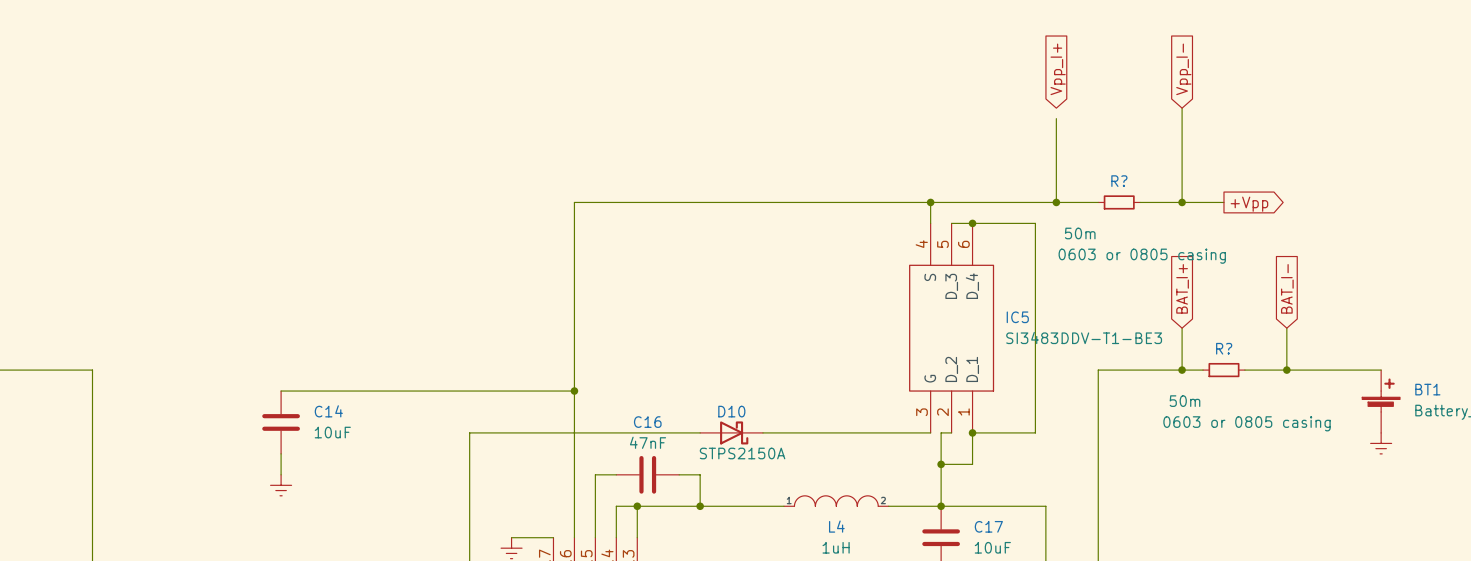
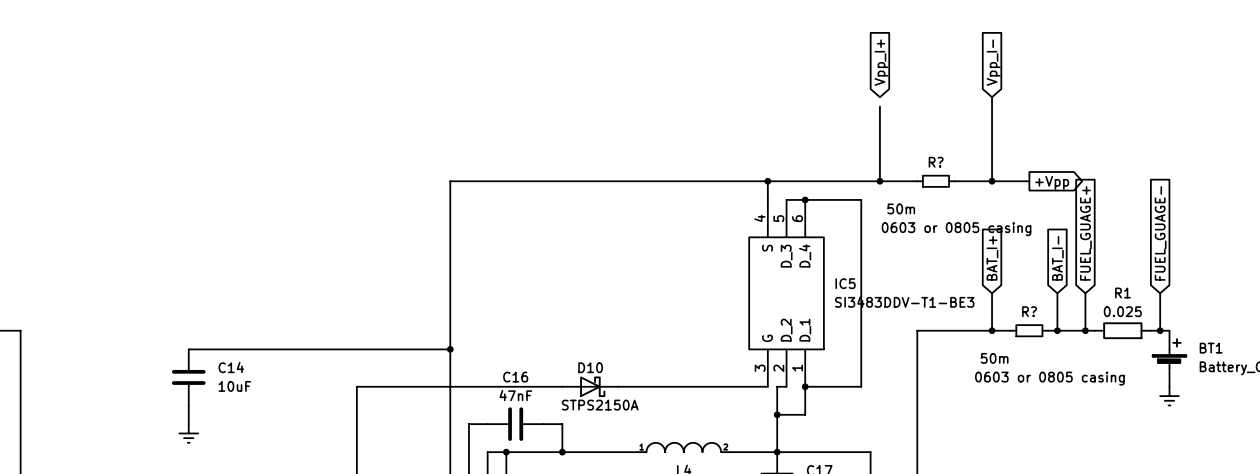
global label: none -> FUEL_GUAGE- (1160, 233)
global label: none -> BAT_I- (1057, 258)
global label: BAT_I- (1287, 288) -> FUEL_GUAGE+ (1085, 233)
wire: none -> (1057, 293) (1057, 330)
wire: none -> (1160, 293) (1160, 330)
junction: none -> (1057, 330)
wire: (1297, 370) (1360, 370) -> none
R1: none -> 0.025 (1122, 330)
junction: none -> (1160, 330)

